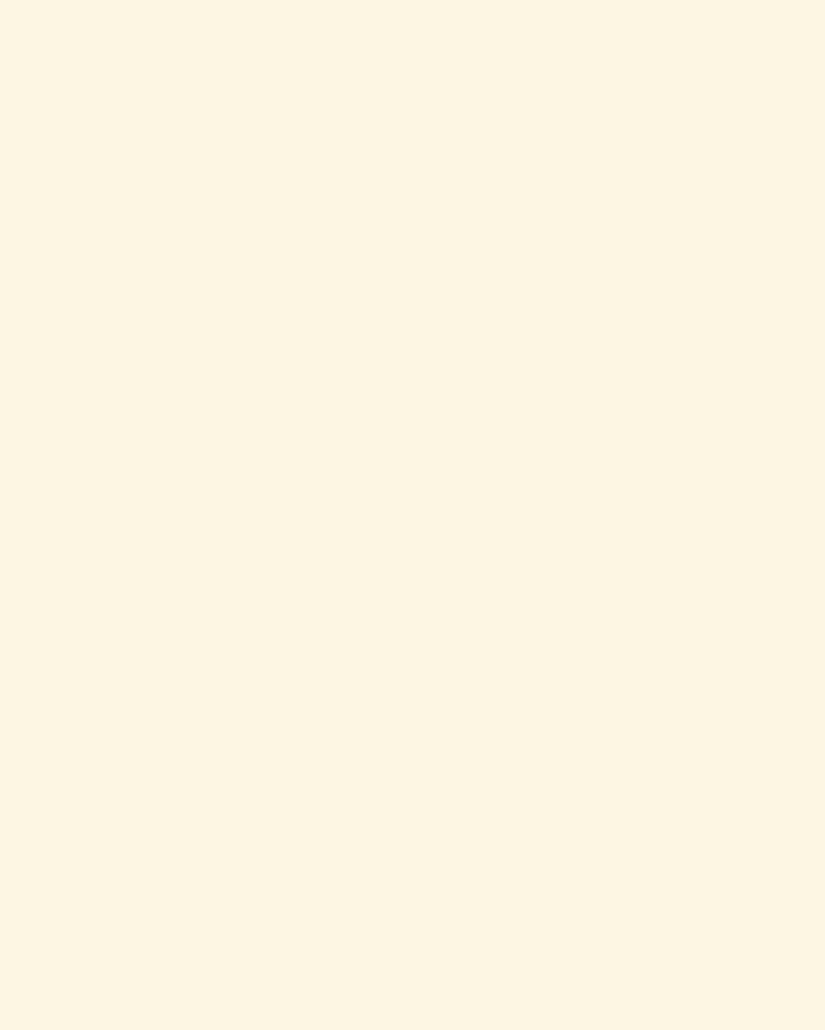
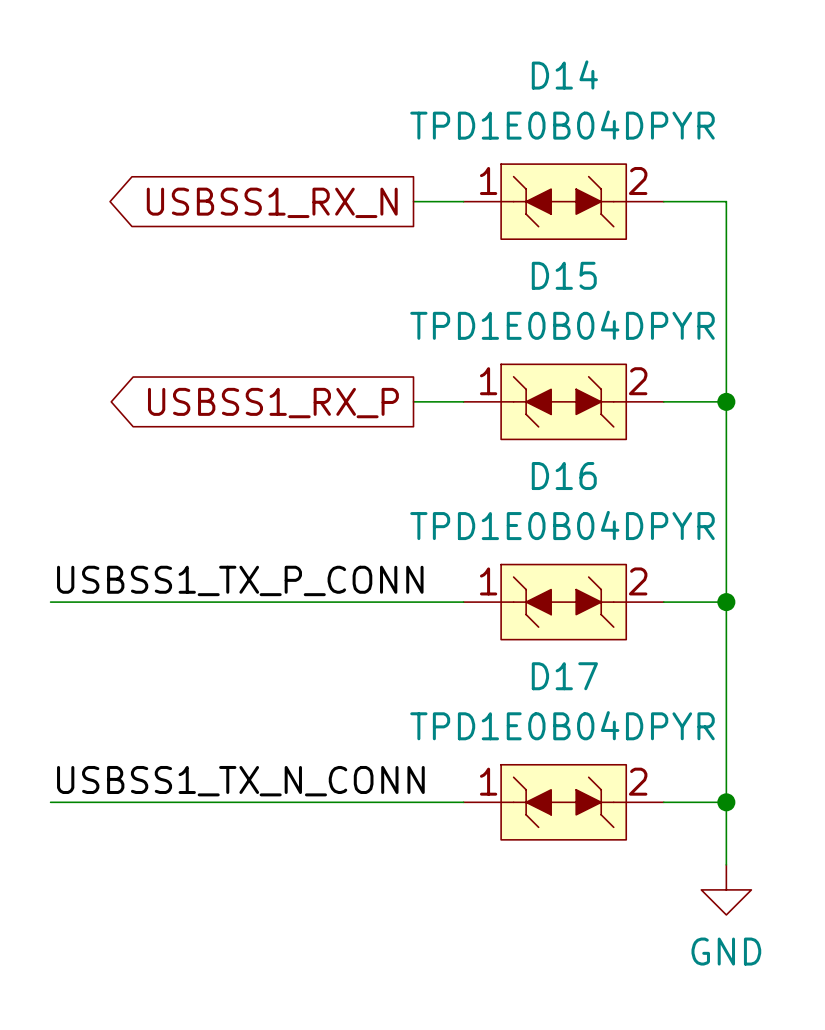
wire: none -> (413, 201) (463, 201)
D14: none -> TPD1E0B04DPYR (563, 201)
wire: none -> (663, 201) (726, 201) (726, 864)
global label: none -> USBSS1_RX_N (272, 202)
wire: none -> (413, 401) (463, 401)
D15: none -> TPD1E0B04DPYR (563, 401)
wire: none -> (663, 401) (726, 401)
junction: none -> (726, 401)
global label: none -> USBSS1_RX_P (273, 403)
label: none -> USBSS1_TX_P_CONN (240, 580)
wire: none -> (50, 602) (463, 602)
D16: none -> TPD1E0B04DPYR (563, 602)
wire: none -> (663, 602) (726, 602)
junction: none -> (726, 602)
label: none -> USBSS1_TX_N_CONN (240, 781)
wire: none -> (50, 802) (463, 802)
D17: none -> TPD1E0B04DPYR (563, 802)
wire: none -> (663, 802) (726, 802)
junction: none -> (726, 802)
power symbol: none -> GND (726, 889)

